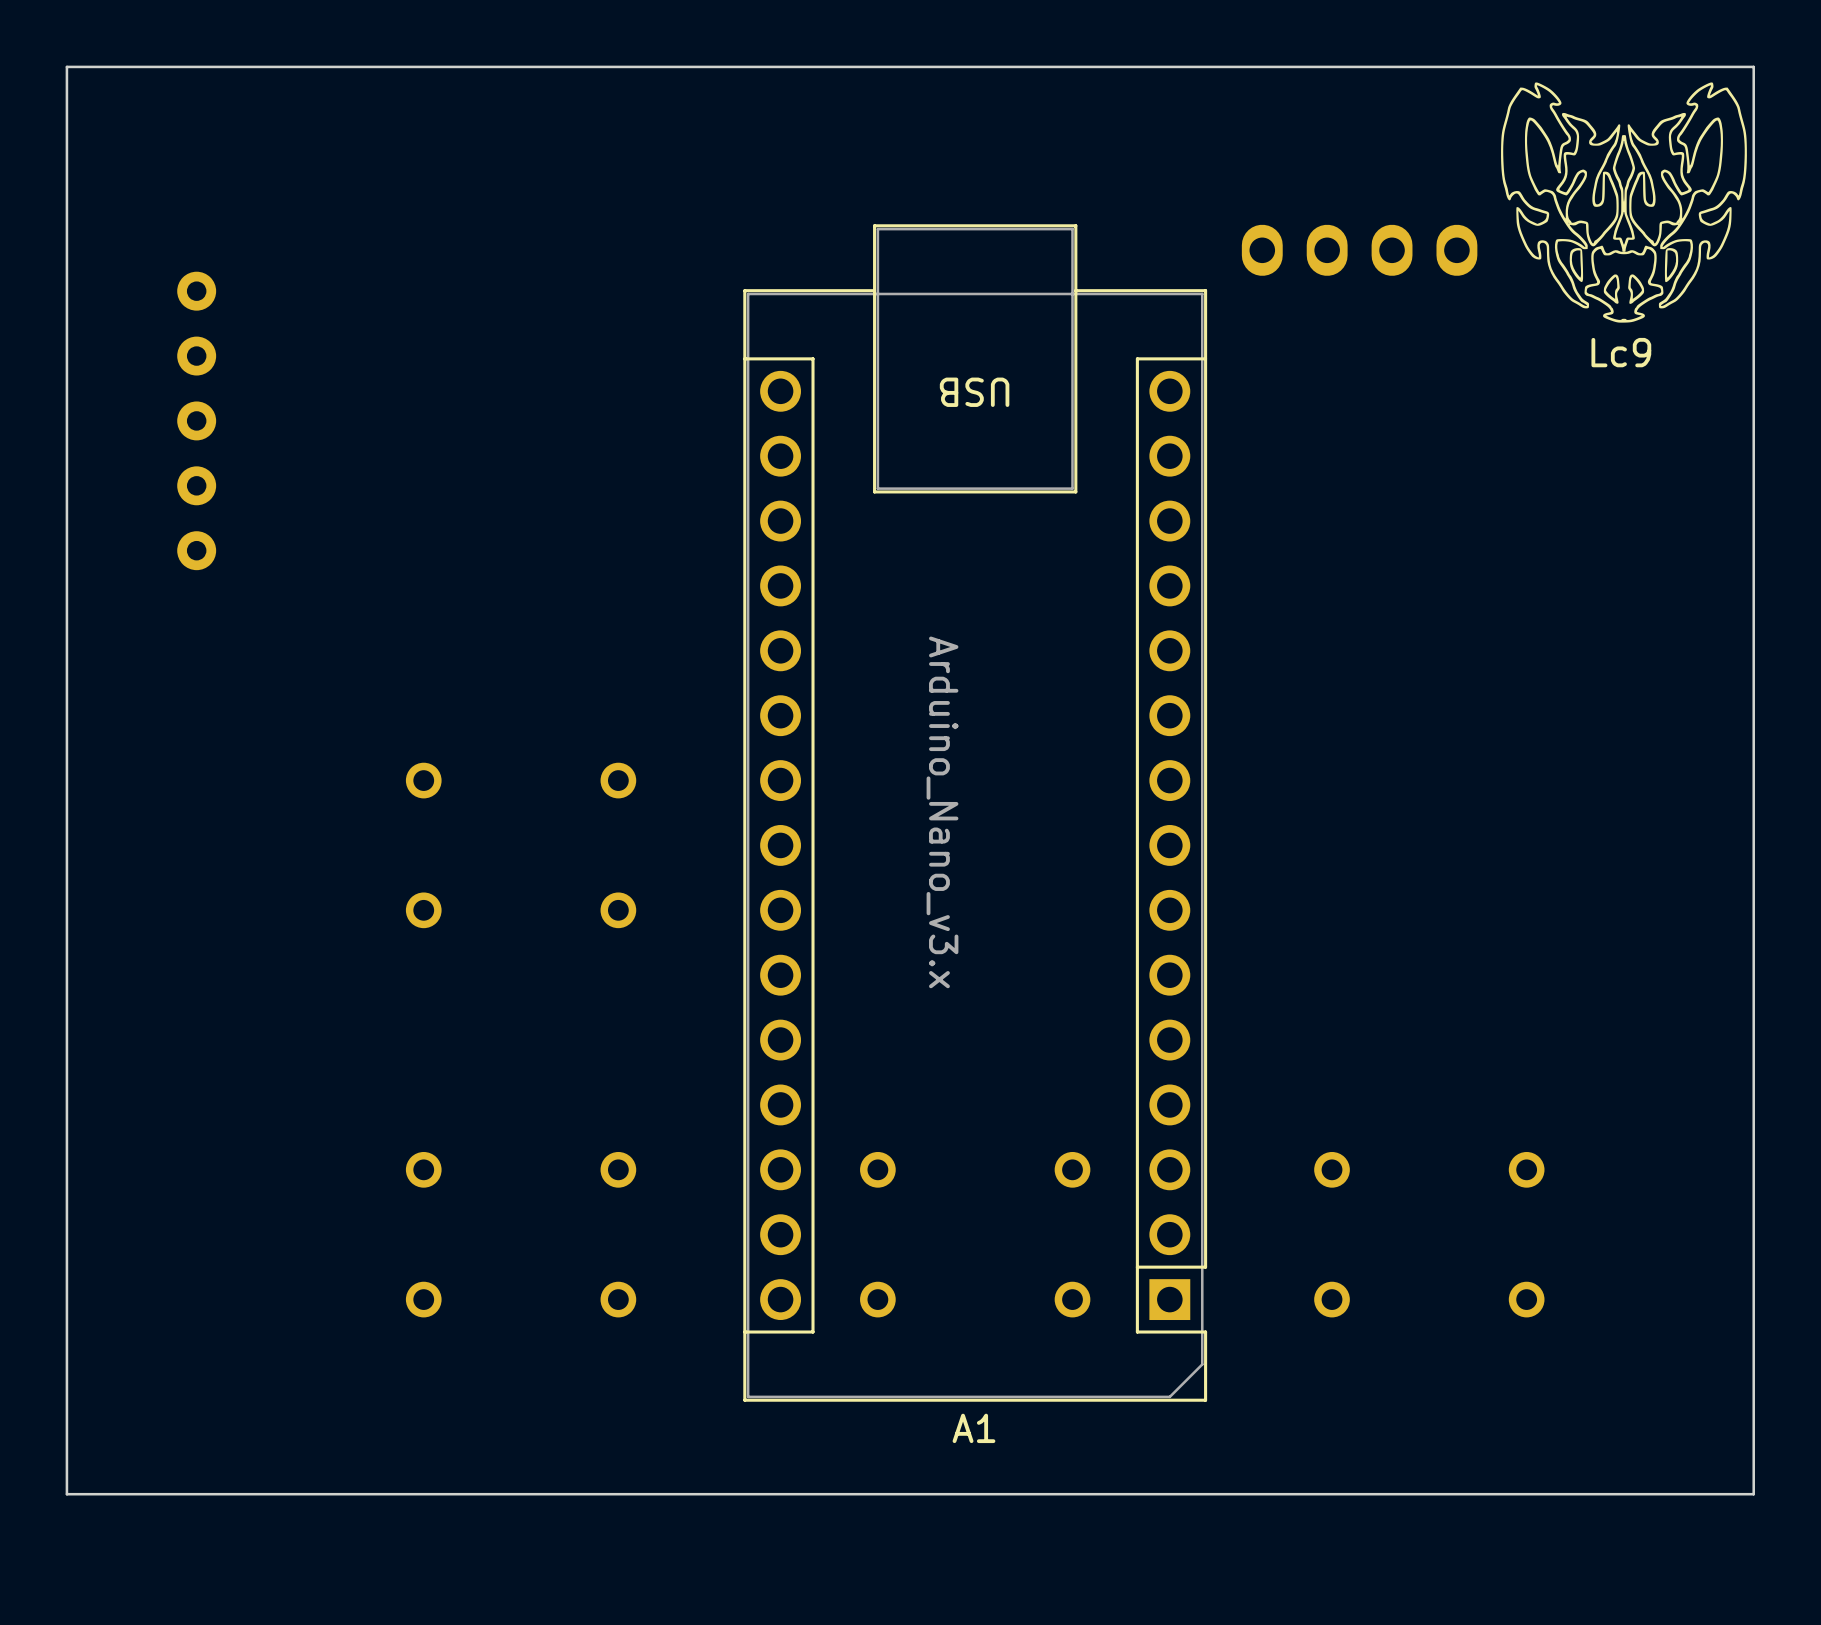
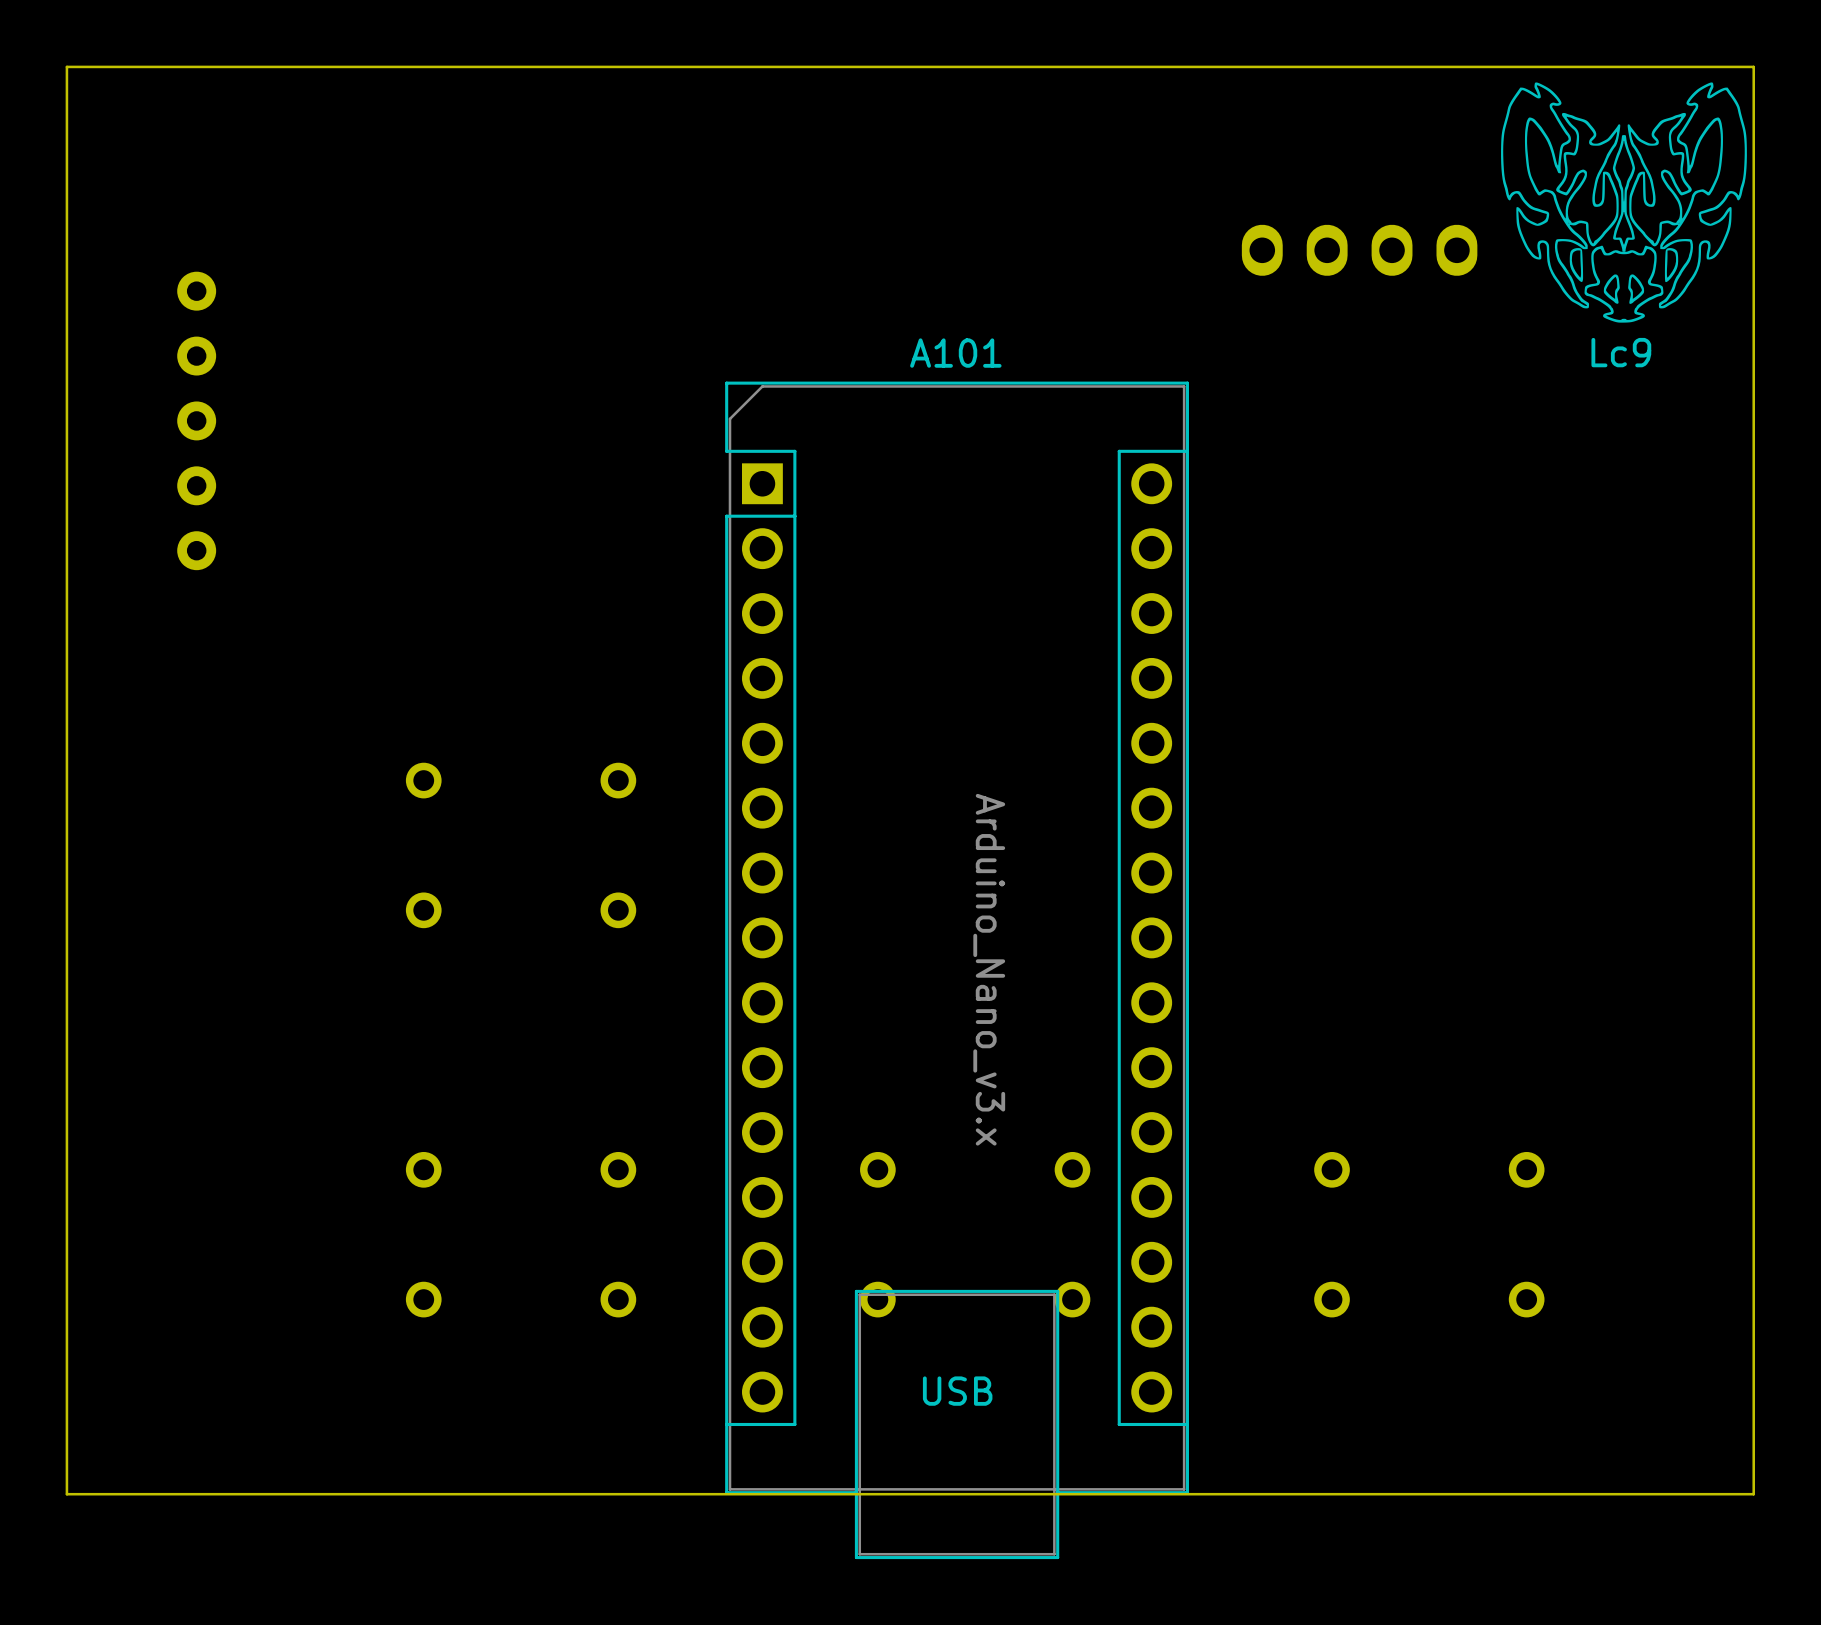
A1: Arduino_Nano_v3.x (975, 813) -> none
A101: none -> Arduino_Nano_v3.x (957, 970)

